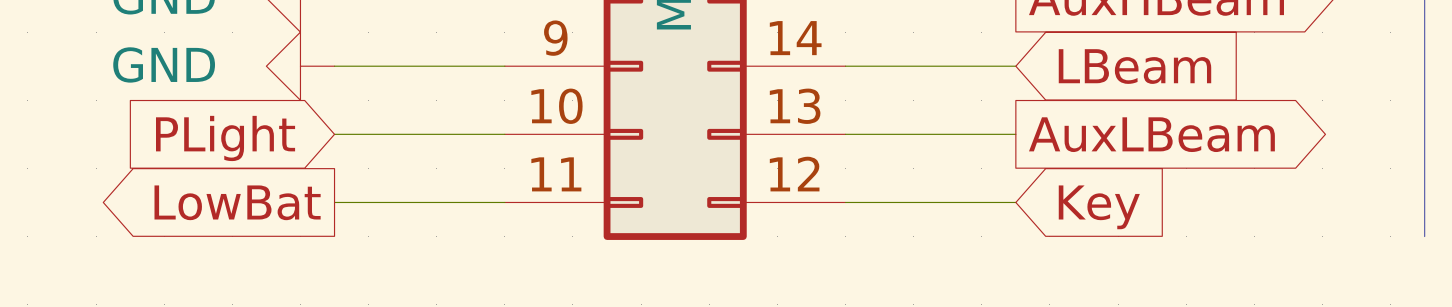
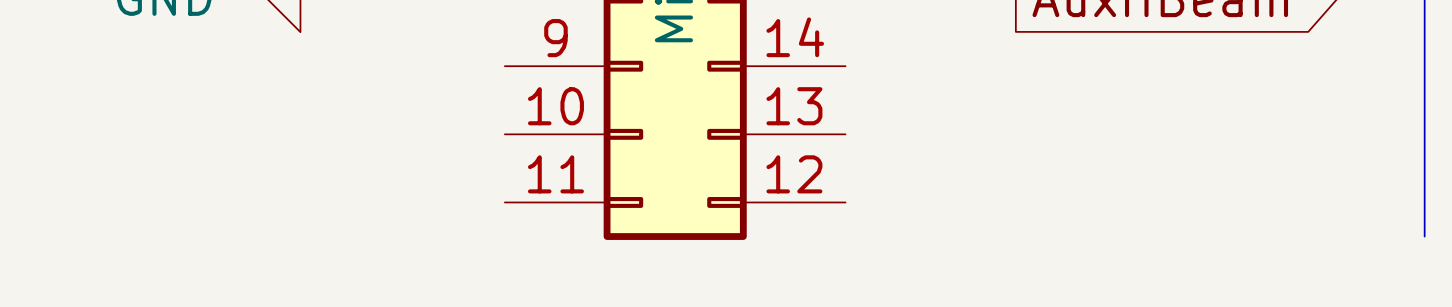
power symbol: GND (300, 66) -> none
wire: (334, 66) (504, 66) -> none
wire: (845, 66) (1015, 66) -> none
global label: LBeam (1134, 66) -> none
wire: (334, 134) (504, 134) -> none
wire: (845, 134) (1015, 134) -> none
global label: AuxLBeam (1151, 134) -> none
global label: PLight (225, 138) -> none
global label: LowBat (237, 202) -> none
wire: (334, 202) (504, 202) -> none
wire: (845, 202) (1015, 202) -> none
global label: Key (1099, 207) -> none

